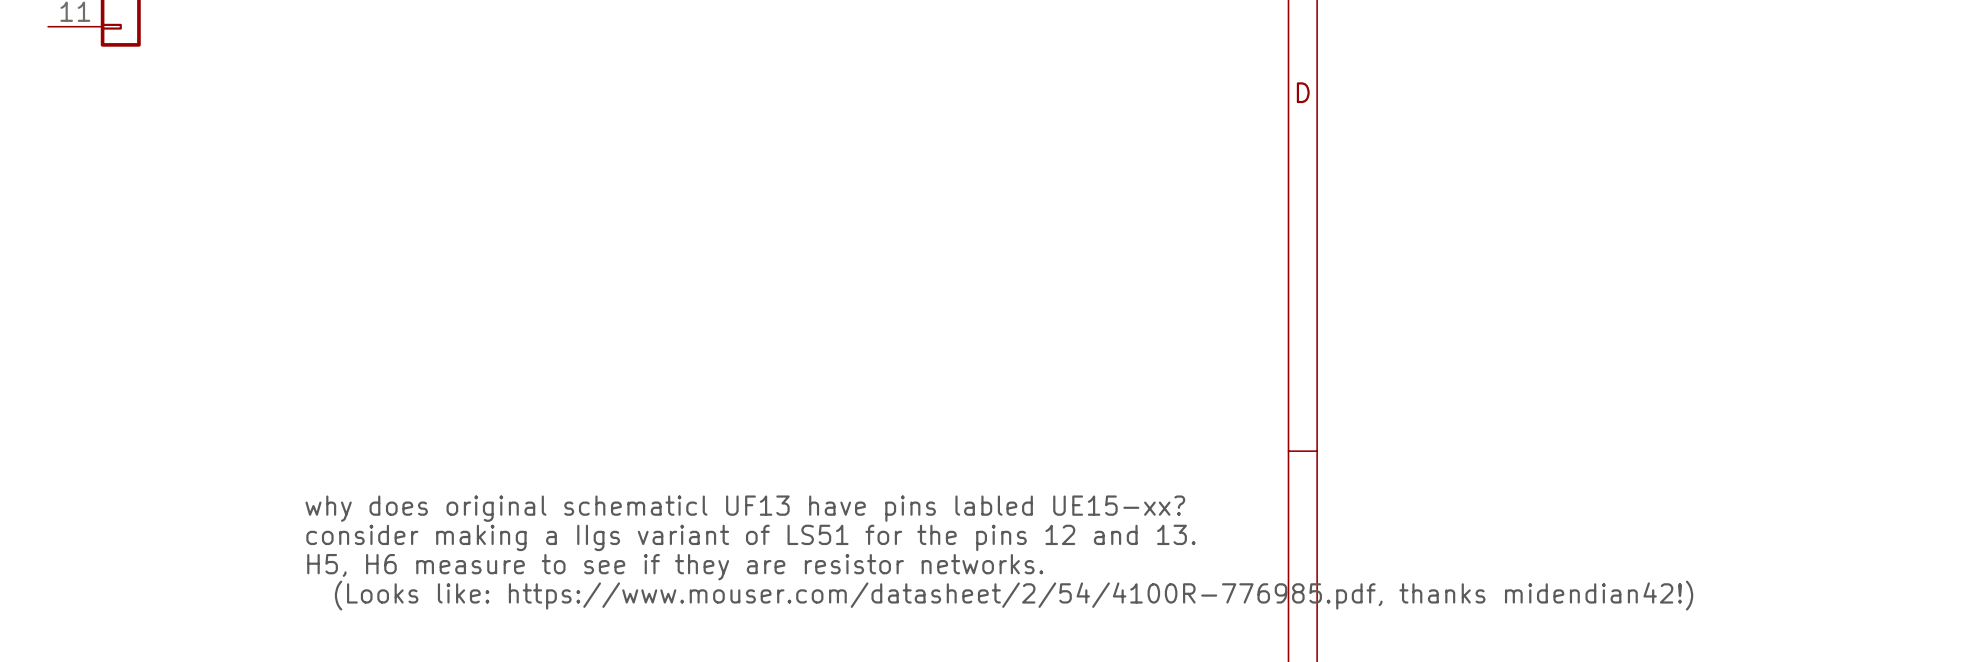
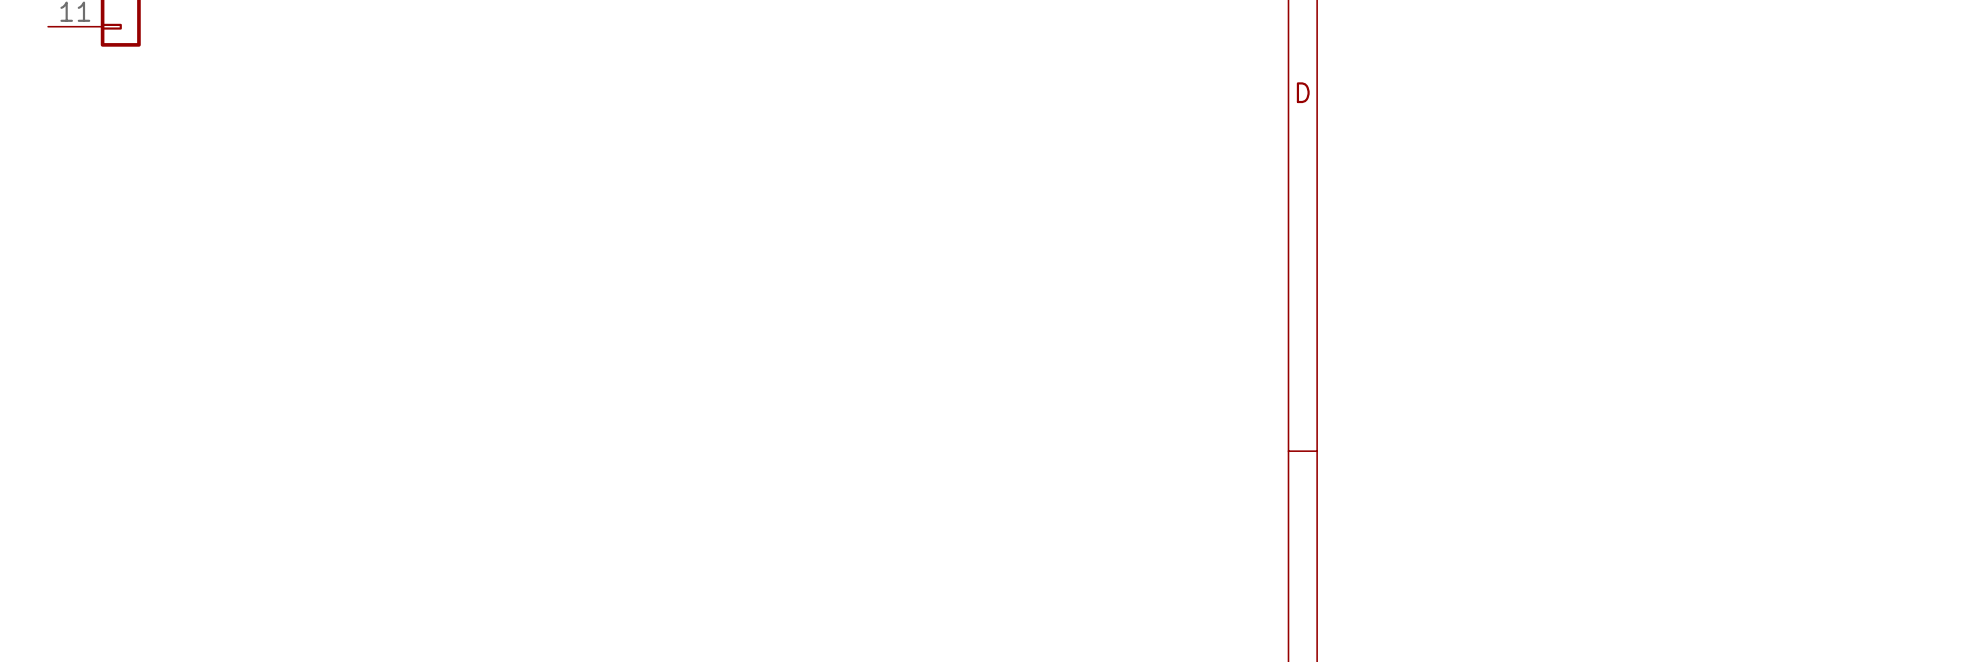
text: why does original schematicl UF13 have pins labled UE15-xx? (745, 508) -> none
text: consider making a IIgs variant of LS51 for the pins 12 and 13. (750, 537) -> none
text: H5, H6 measure to see if they are resistor networks. (675, 567) -> none
text: (Looks like: https://www.mouser.com/datasheet/2/54/4100R-776985.pdf, thanks midendian42!) (1014, 595) -> none

